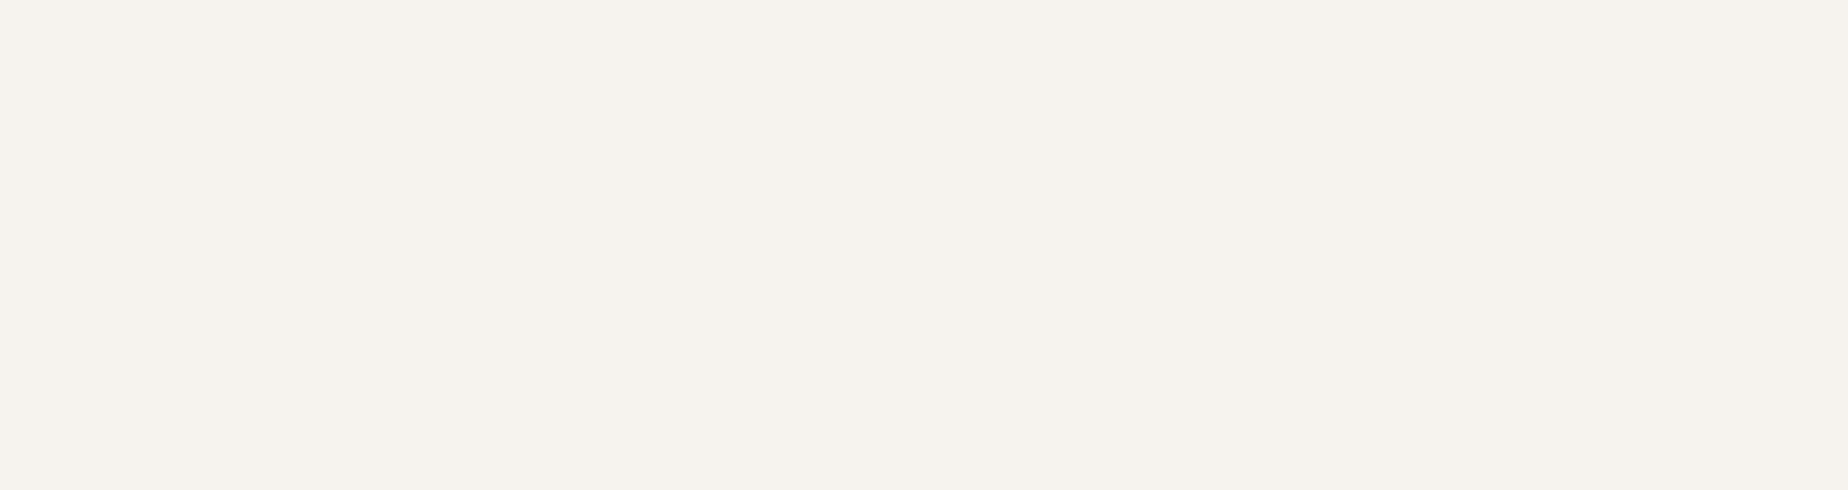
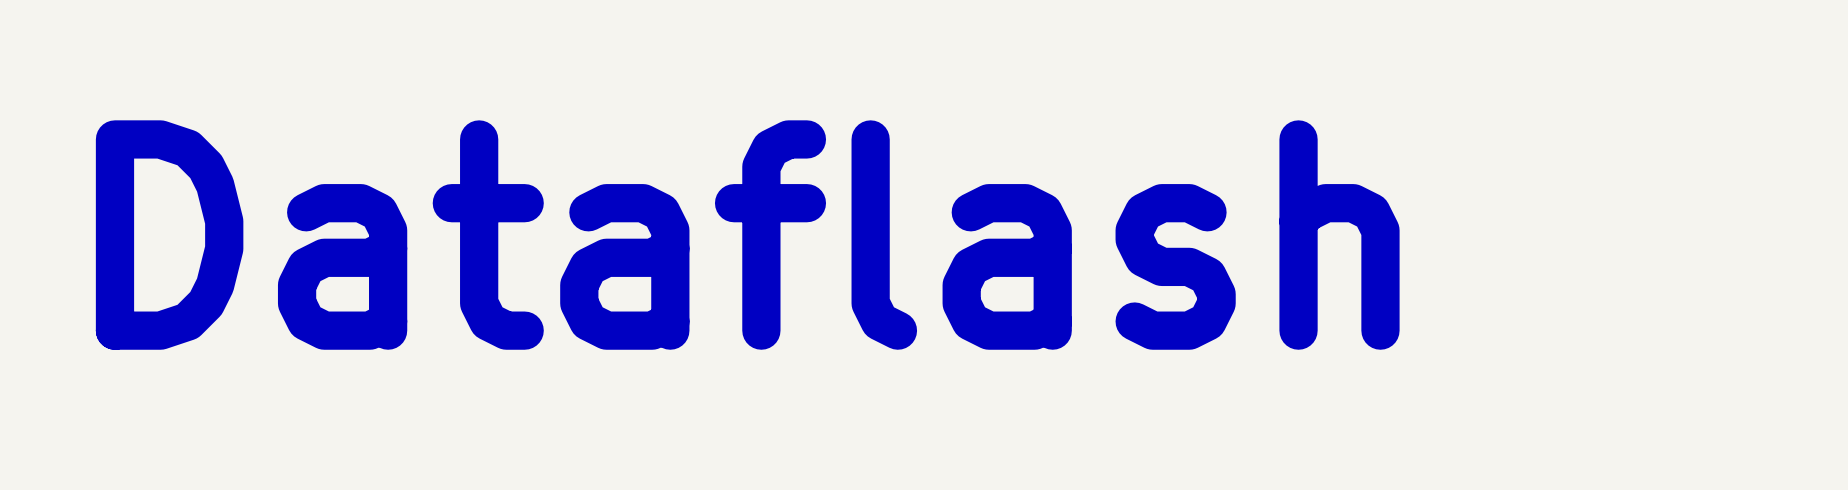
text: none -> Dataflash (747, 235)

